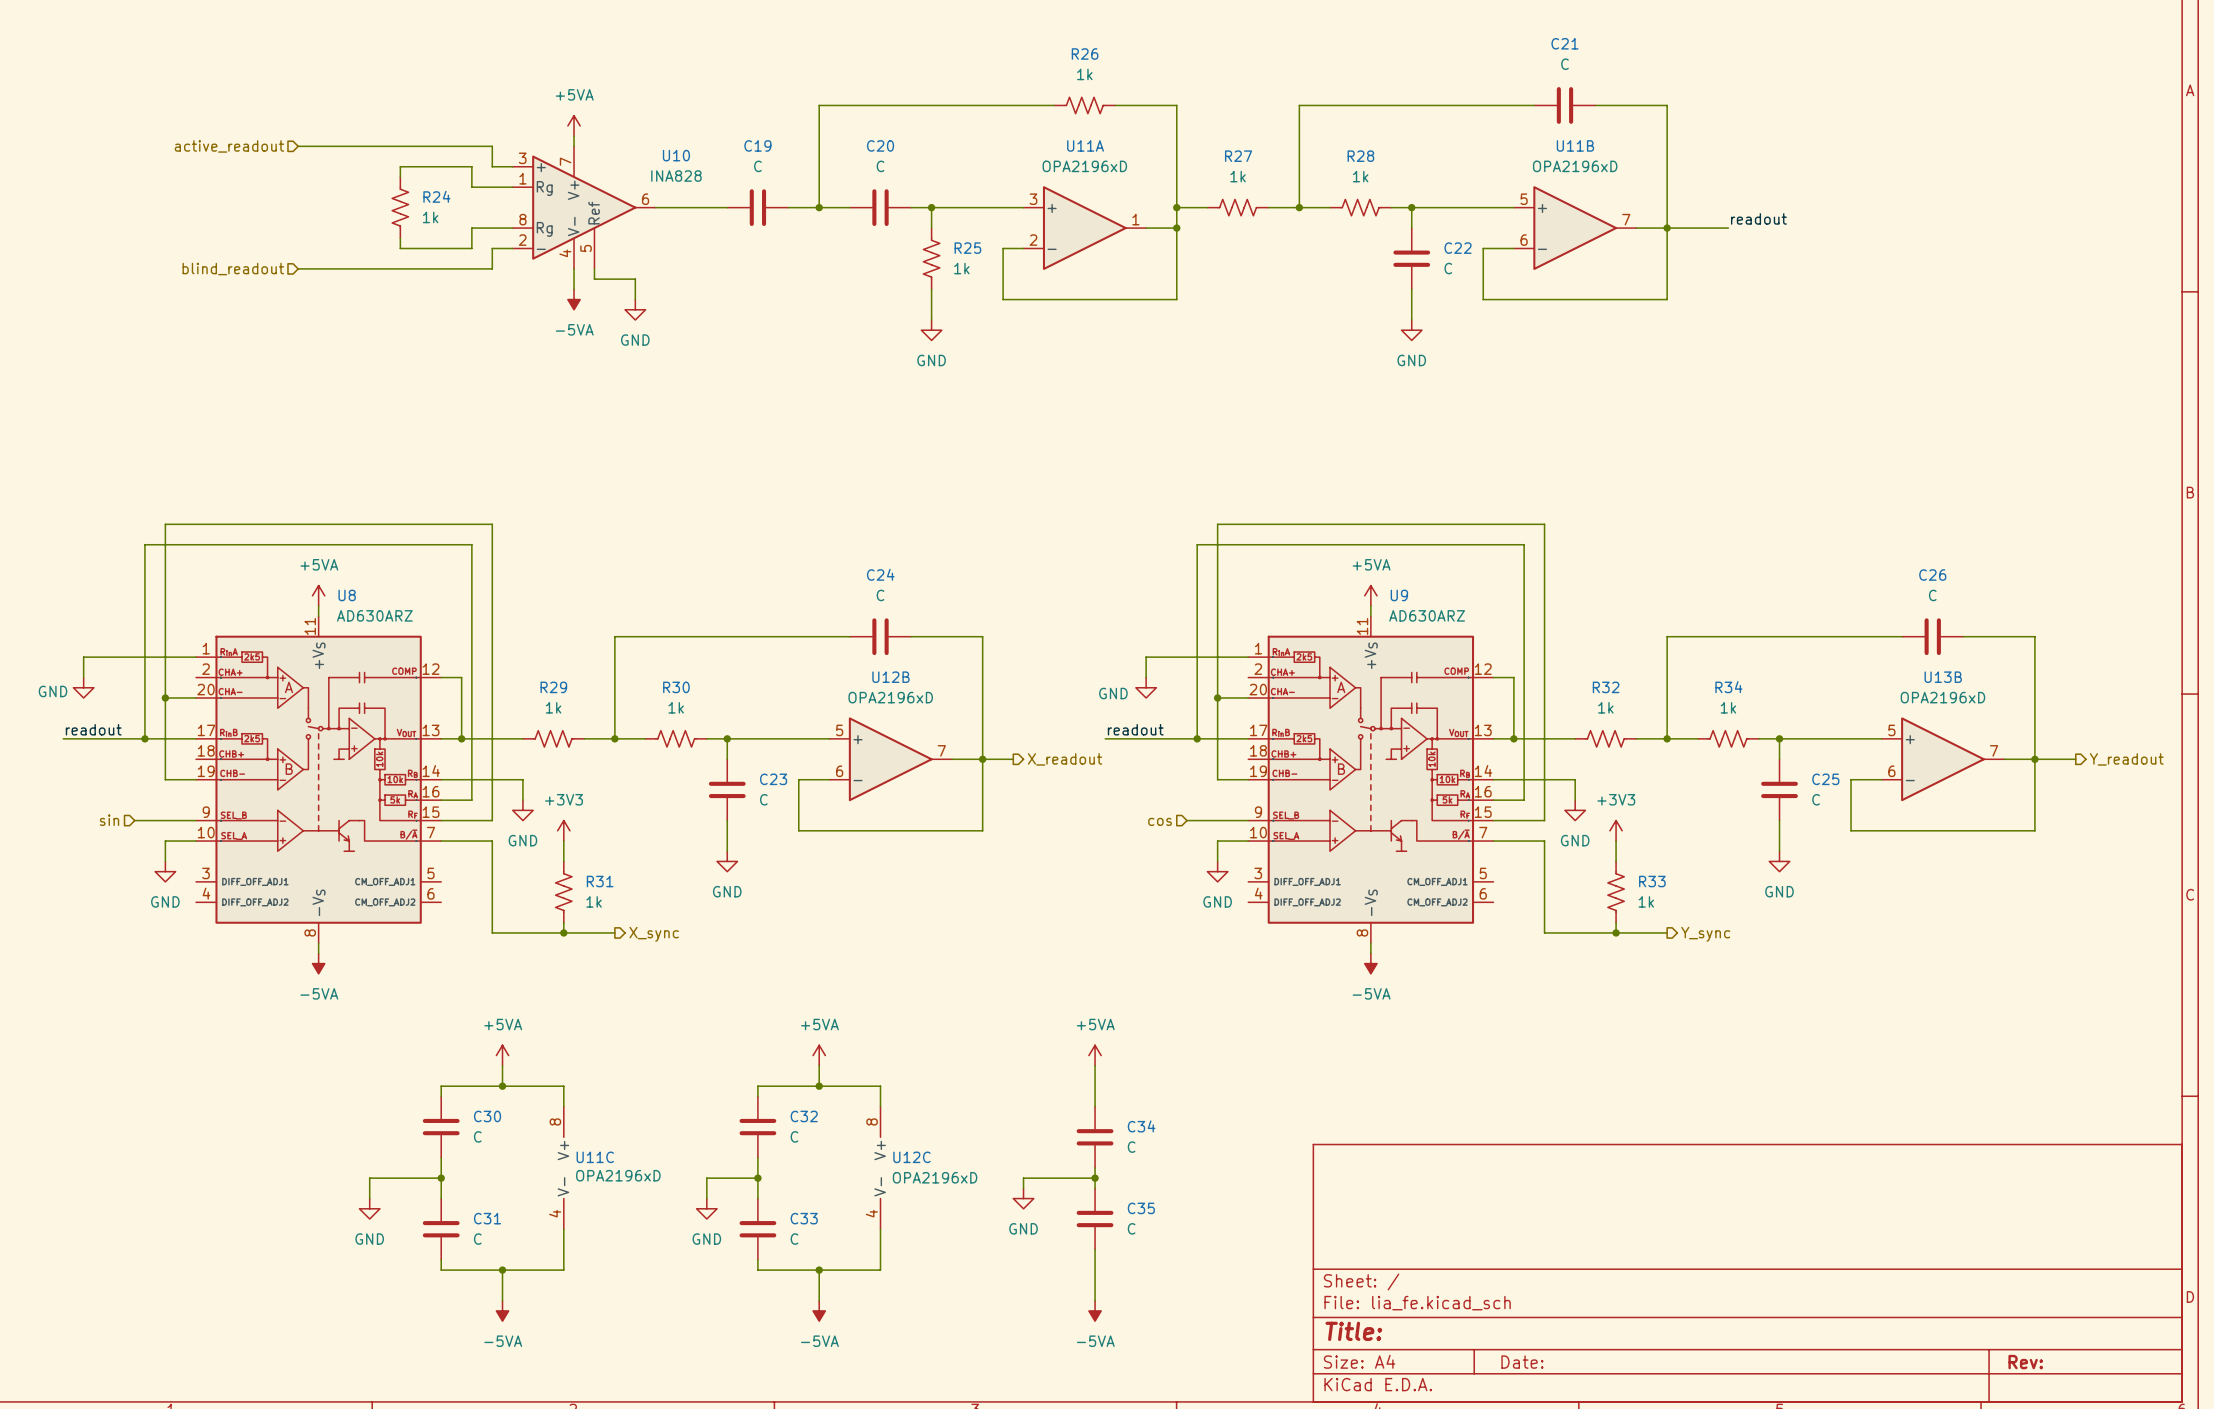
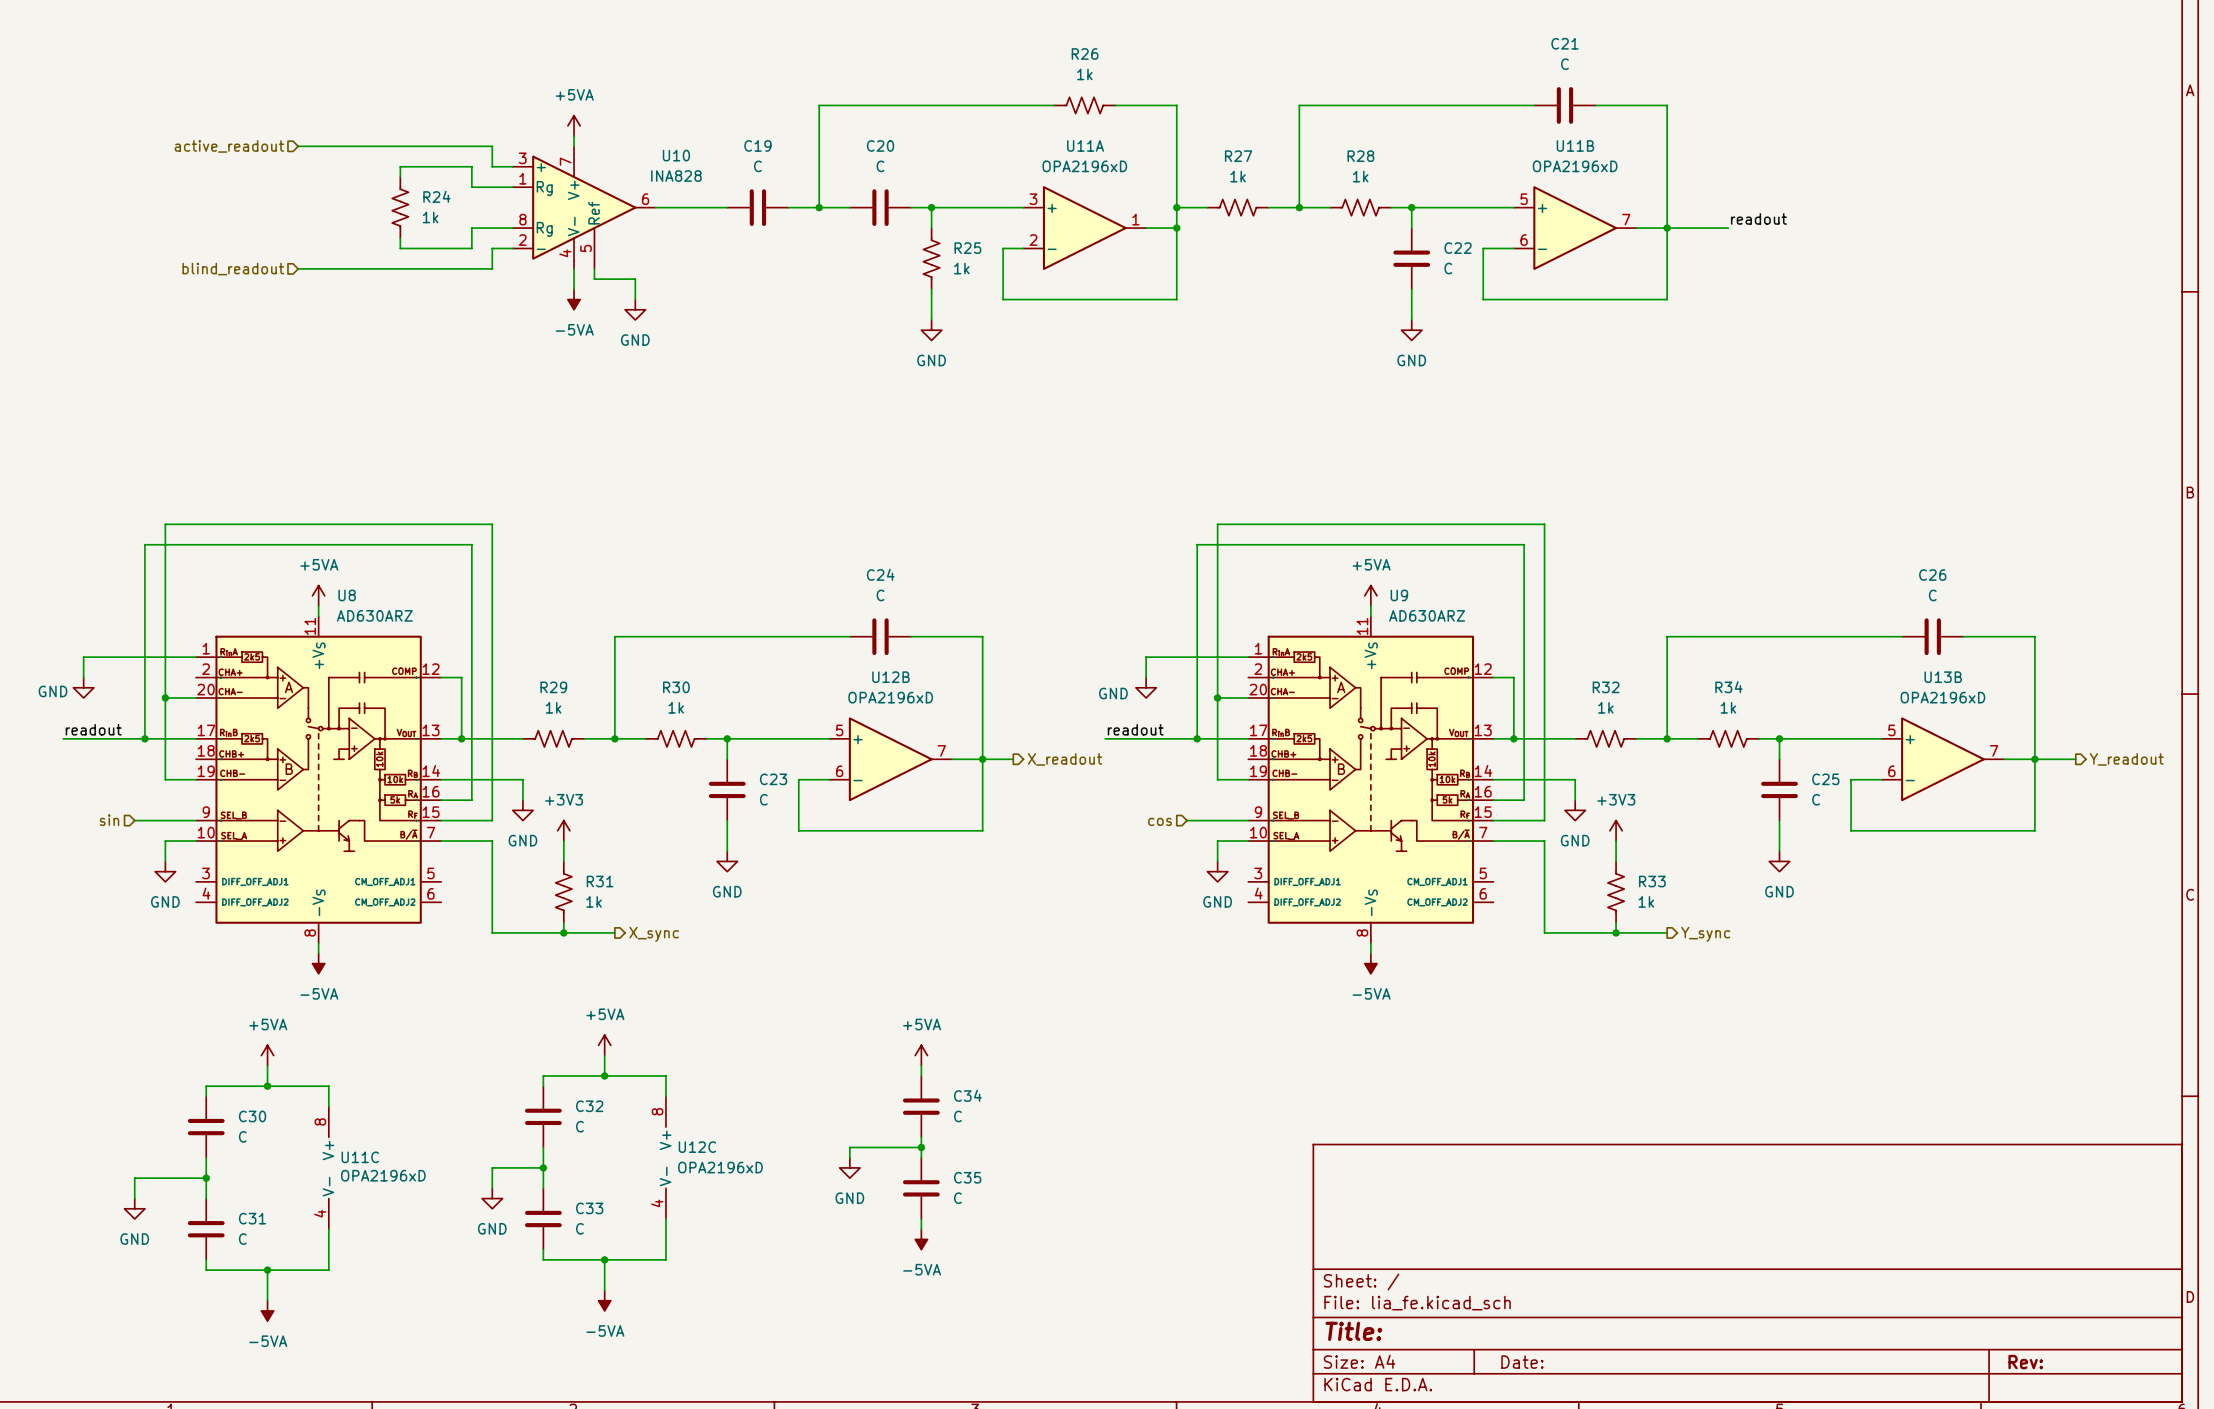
power symbol: none -> +5VA (267, 1055)
power symbol position: +5VA (502, 1055) -> +5VA (604, 1045)
power symbol: +5VA (819, 1055) -> none
power symbol: none -> +5VA (921, 1055)
power symbol: +5VA (1095, 1055) -> none
wire: none -> (267, 1065) (267, 1086)
wire: (502, 1065) (502, 1086) -> (604, 1055) (604, 1075)
wire: (819, 1065) (819, 1086) -> none
wire: none -> (921, 1065) (921, 1075)
wire: (1095, 1065) (1095, 1106) -> none
junction: none -> (604, 1075)
junction: none -> (267, 1086)
junction: (502, 1086) -> none
junction: (819, 1086) -> none
wire: none -> (206, 1096) (206, 1086) (328, 1086) (328, 1106)
wire: (441, 1096) (441, 1086) (563, 1086) (563, 1106) -> (543, 1086) (543, 1075) (665, 1075) (665, 1096)
wire: (757, 1096) (757, 1086) (880, 1086) (880, 1106) -> none
C30 position: (441, 1127) -> (206, 1127)
C32 position: (757, 1127) -> (543, 1116)
C34 position: (1095, 1137) -> (921, 1106)
junction: none -> (921, 1147)
wire: none -> (206, 1157) (206, 1198)
wire: (441, 1157) (441, 1198) -> (543, 1147) (543, 1188)
wire: (757, 1157) (757, 1198) -> none
wire: none -> (543, 1167) (492, 1167) (492, 1188)
junction: none -> (543, 1167)
U11C position: (563, 1167) -> (328, 1167)
power symbol: none -> GND (849, 1167)
U12C position: (880, 1167) -> (665, 1157)
wire: (1095, 1167) (1095, 1188) -> (921, 1137) (921, 1157)
wire: none -> (206, 1178) (134, 1178) (134, 1198)
junction: none -> (206, 1178)
wire: (441, 1178) (369, 1178) (369, 1198) -> none
junction: (441, 1178) -> none
wire: (757, 1178) (706, 1178) (706, 1198) -> none
junction: (757, 1178) -> none
wire: (1095, 1178) (1023, 1178) (1023, 1188) -> (921, 1147) (849, 1147) (849, 1157)
junction: (1095, 1178) -> none
power symbol: none -> GND (492, 1198)
power symbol: GND (1023, 1198) -> none
power symbol: none -> GND (134, 1208)
power symbol: GND (369, 1208) -> none
power symbol: GND (706, 1208) -> none
wire: none -> (921, 1219) (921, 1229)
C35 position: (1095, 1219) -> (921, 1188)
wire: none -> (328, 1229) (328, 1270) (206, 1270) (206, 1259)
C31 position: (441, 1229) -> (206, 1229)
wire: (563, 1229) (563, 1270) (441, 1270) (441, 1259) -> (665, 1219) (665, 1259) (543, 1259) (543, 1249)
C33 position: (757, 1229) -> (543, 1219)
wire: (880, 1229) (880, 1270) (757, 1270) (757, 1259) -> none
power symbol: none -> -5VA (921, 1239)
wire: (1095, 1249) (1095, 1300) -> none
junction: none -> (604, 1259)
wire: none -> (267, 1270) (267, 1300)
junction: none -> (267, 1270)
wire: (502, 1270) (502, 1300) -> (604, 1259) (604, 1290)
junction: (502, 1270) -> none
wire: (819, 1270) (819, 1300) -> none
junction: (819, 1270) -> none
power symbol: none -> -5VA (267, 1310)
power symbol position: -5VA (502, 1310) -> -5VA (604, 1300)
power symbol: -5VA (819, 1310) -> none
power symbol: -5VA (1095, 1310) -> none

